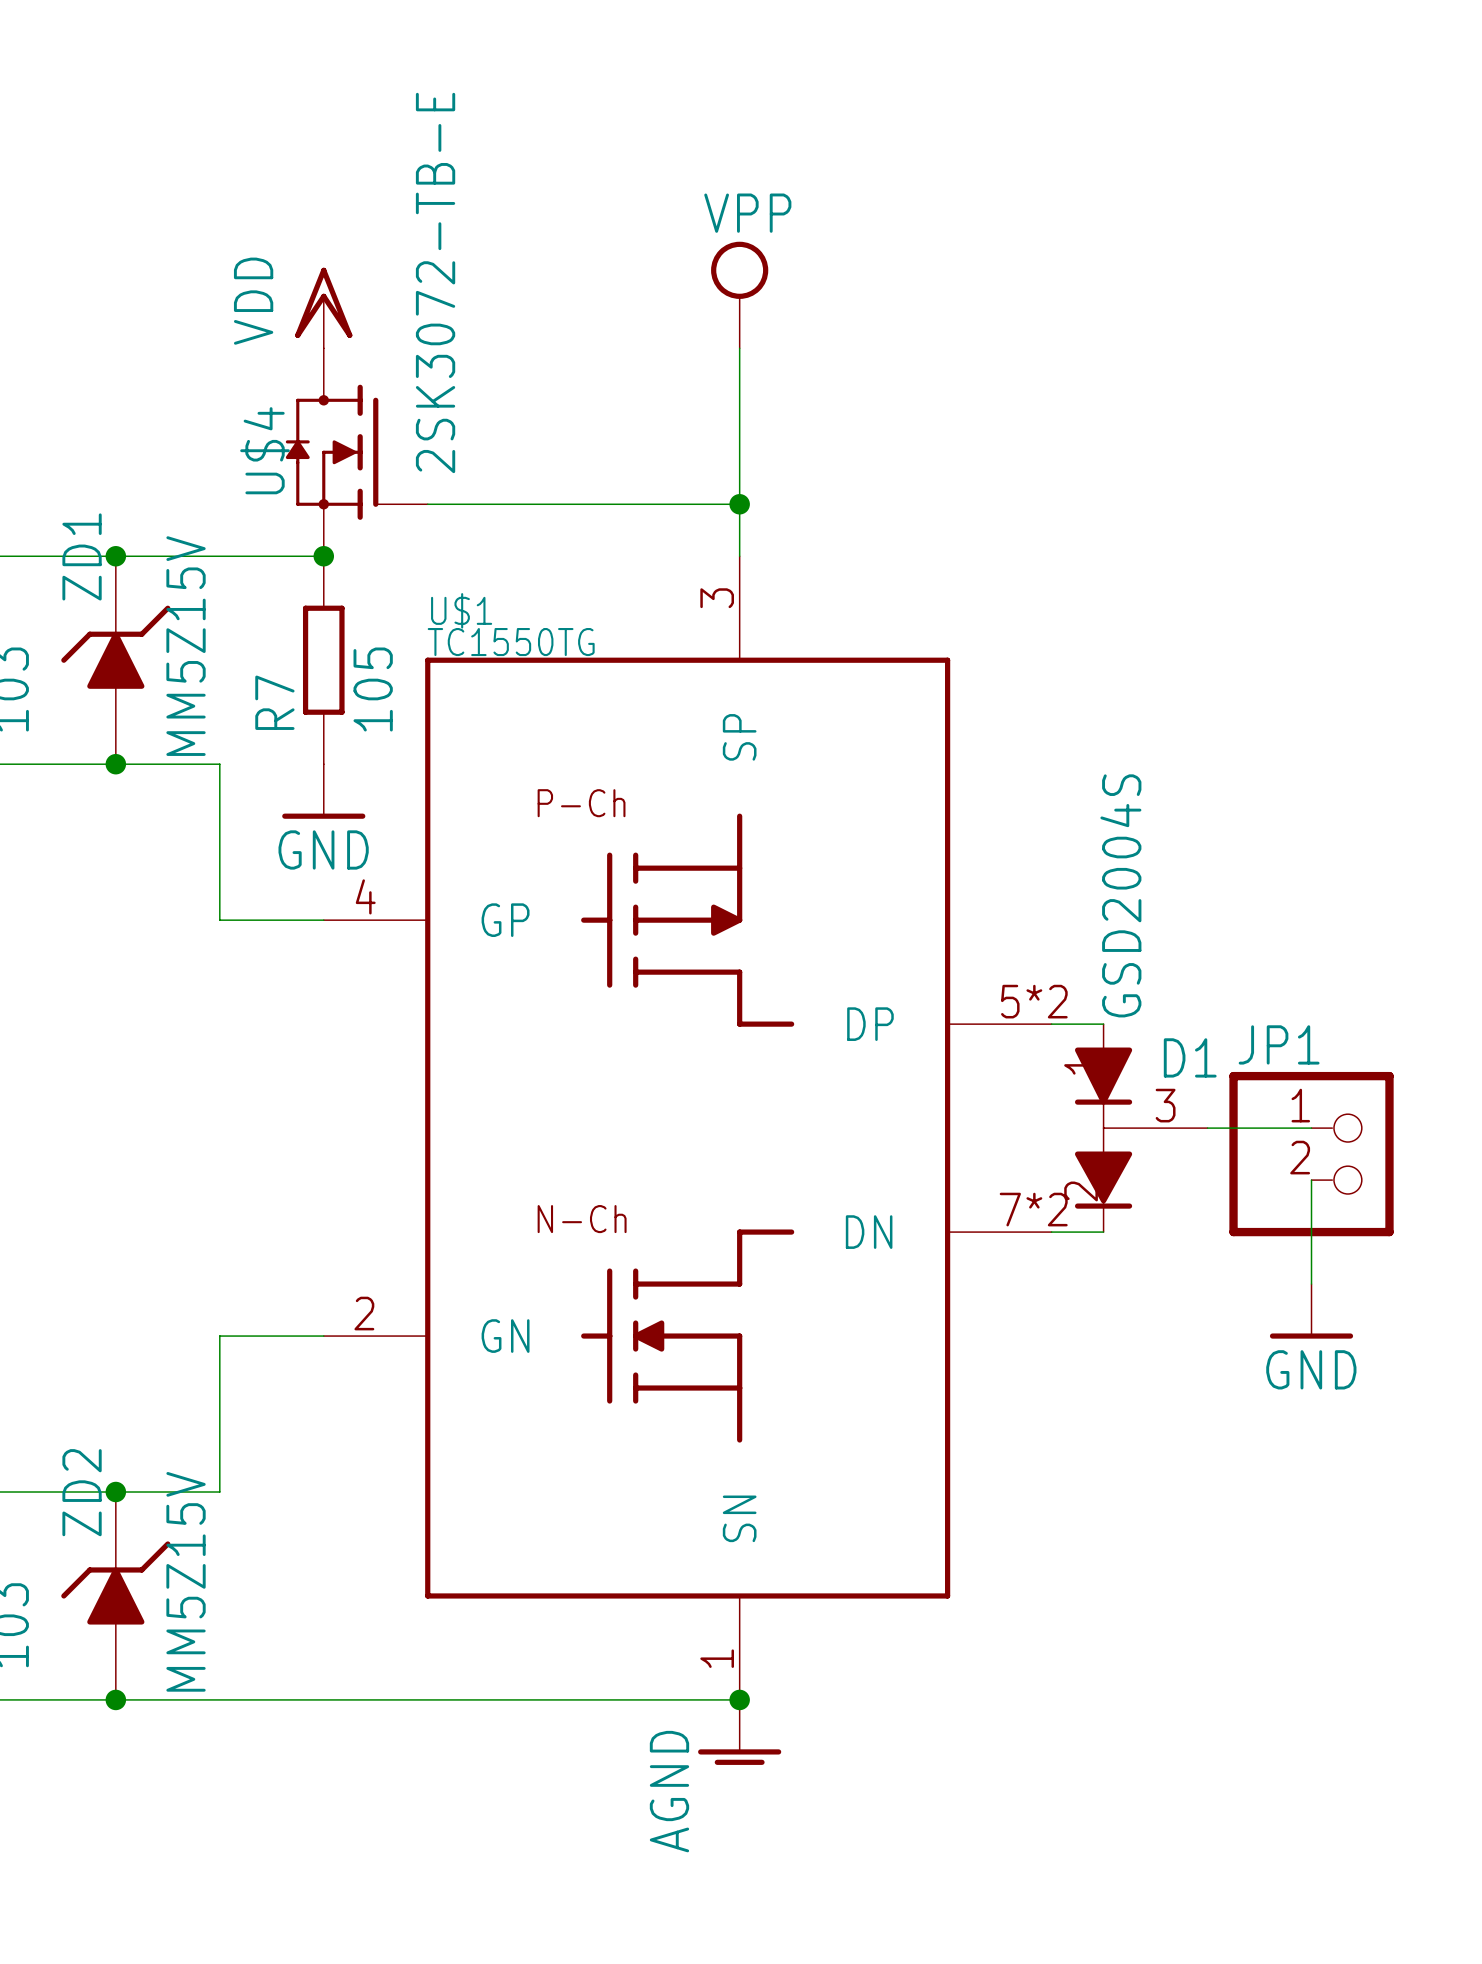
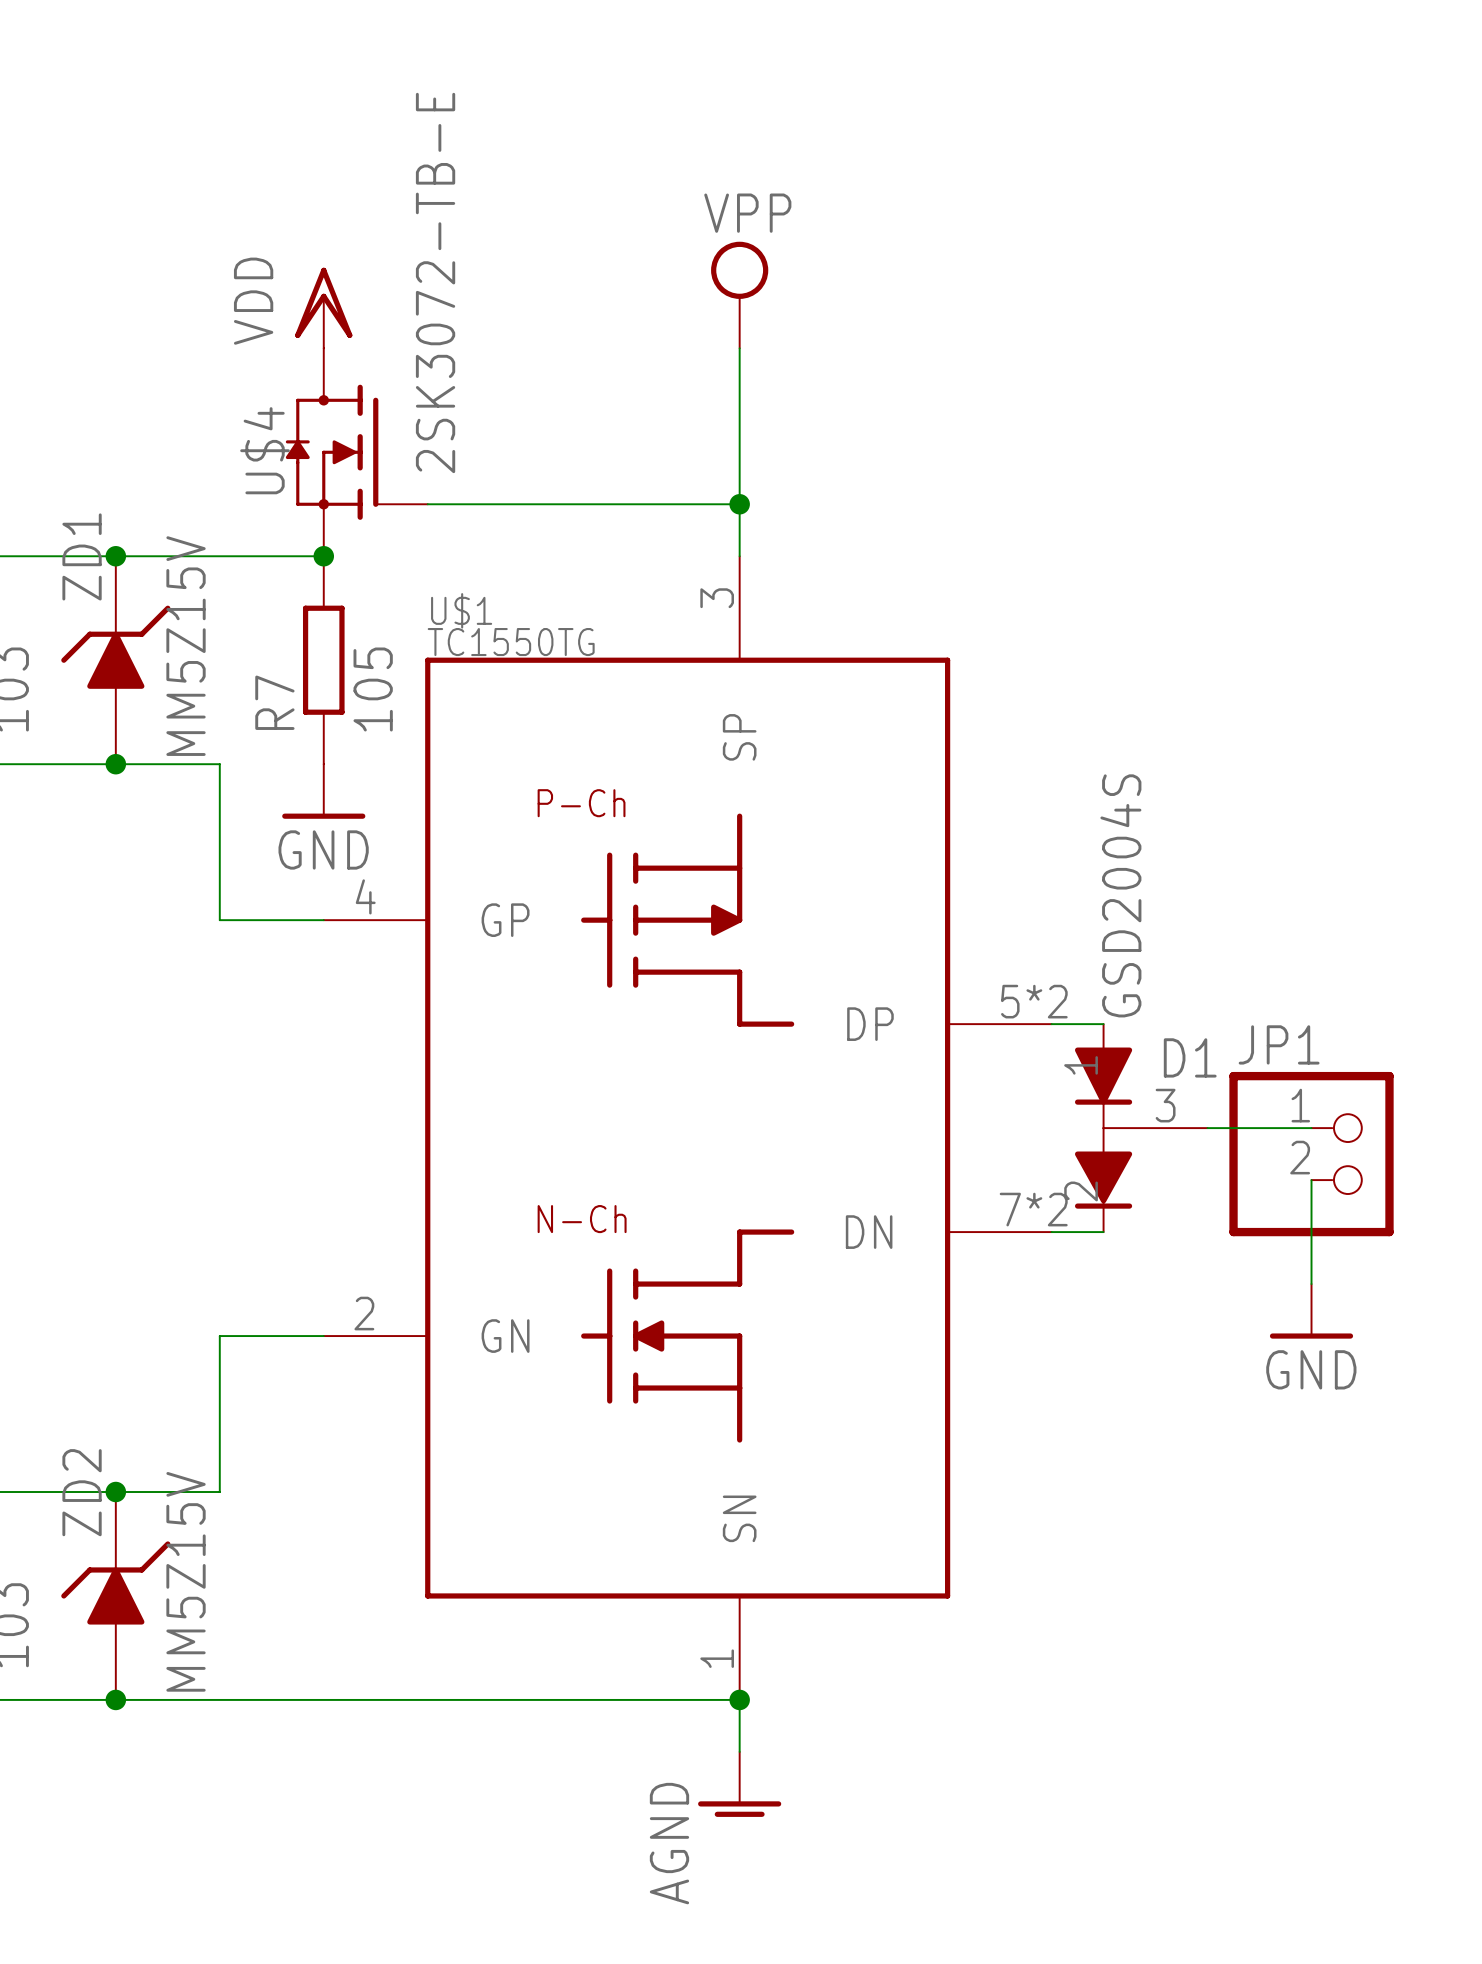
power symbol position: AGND (739, 1732) -> AGND (739, 1784)

